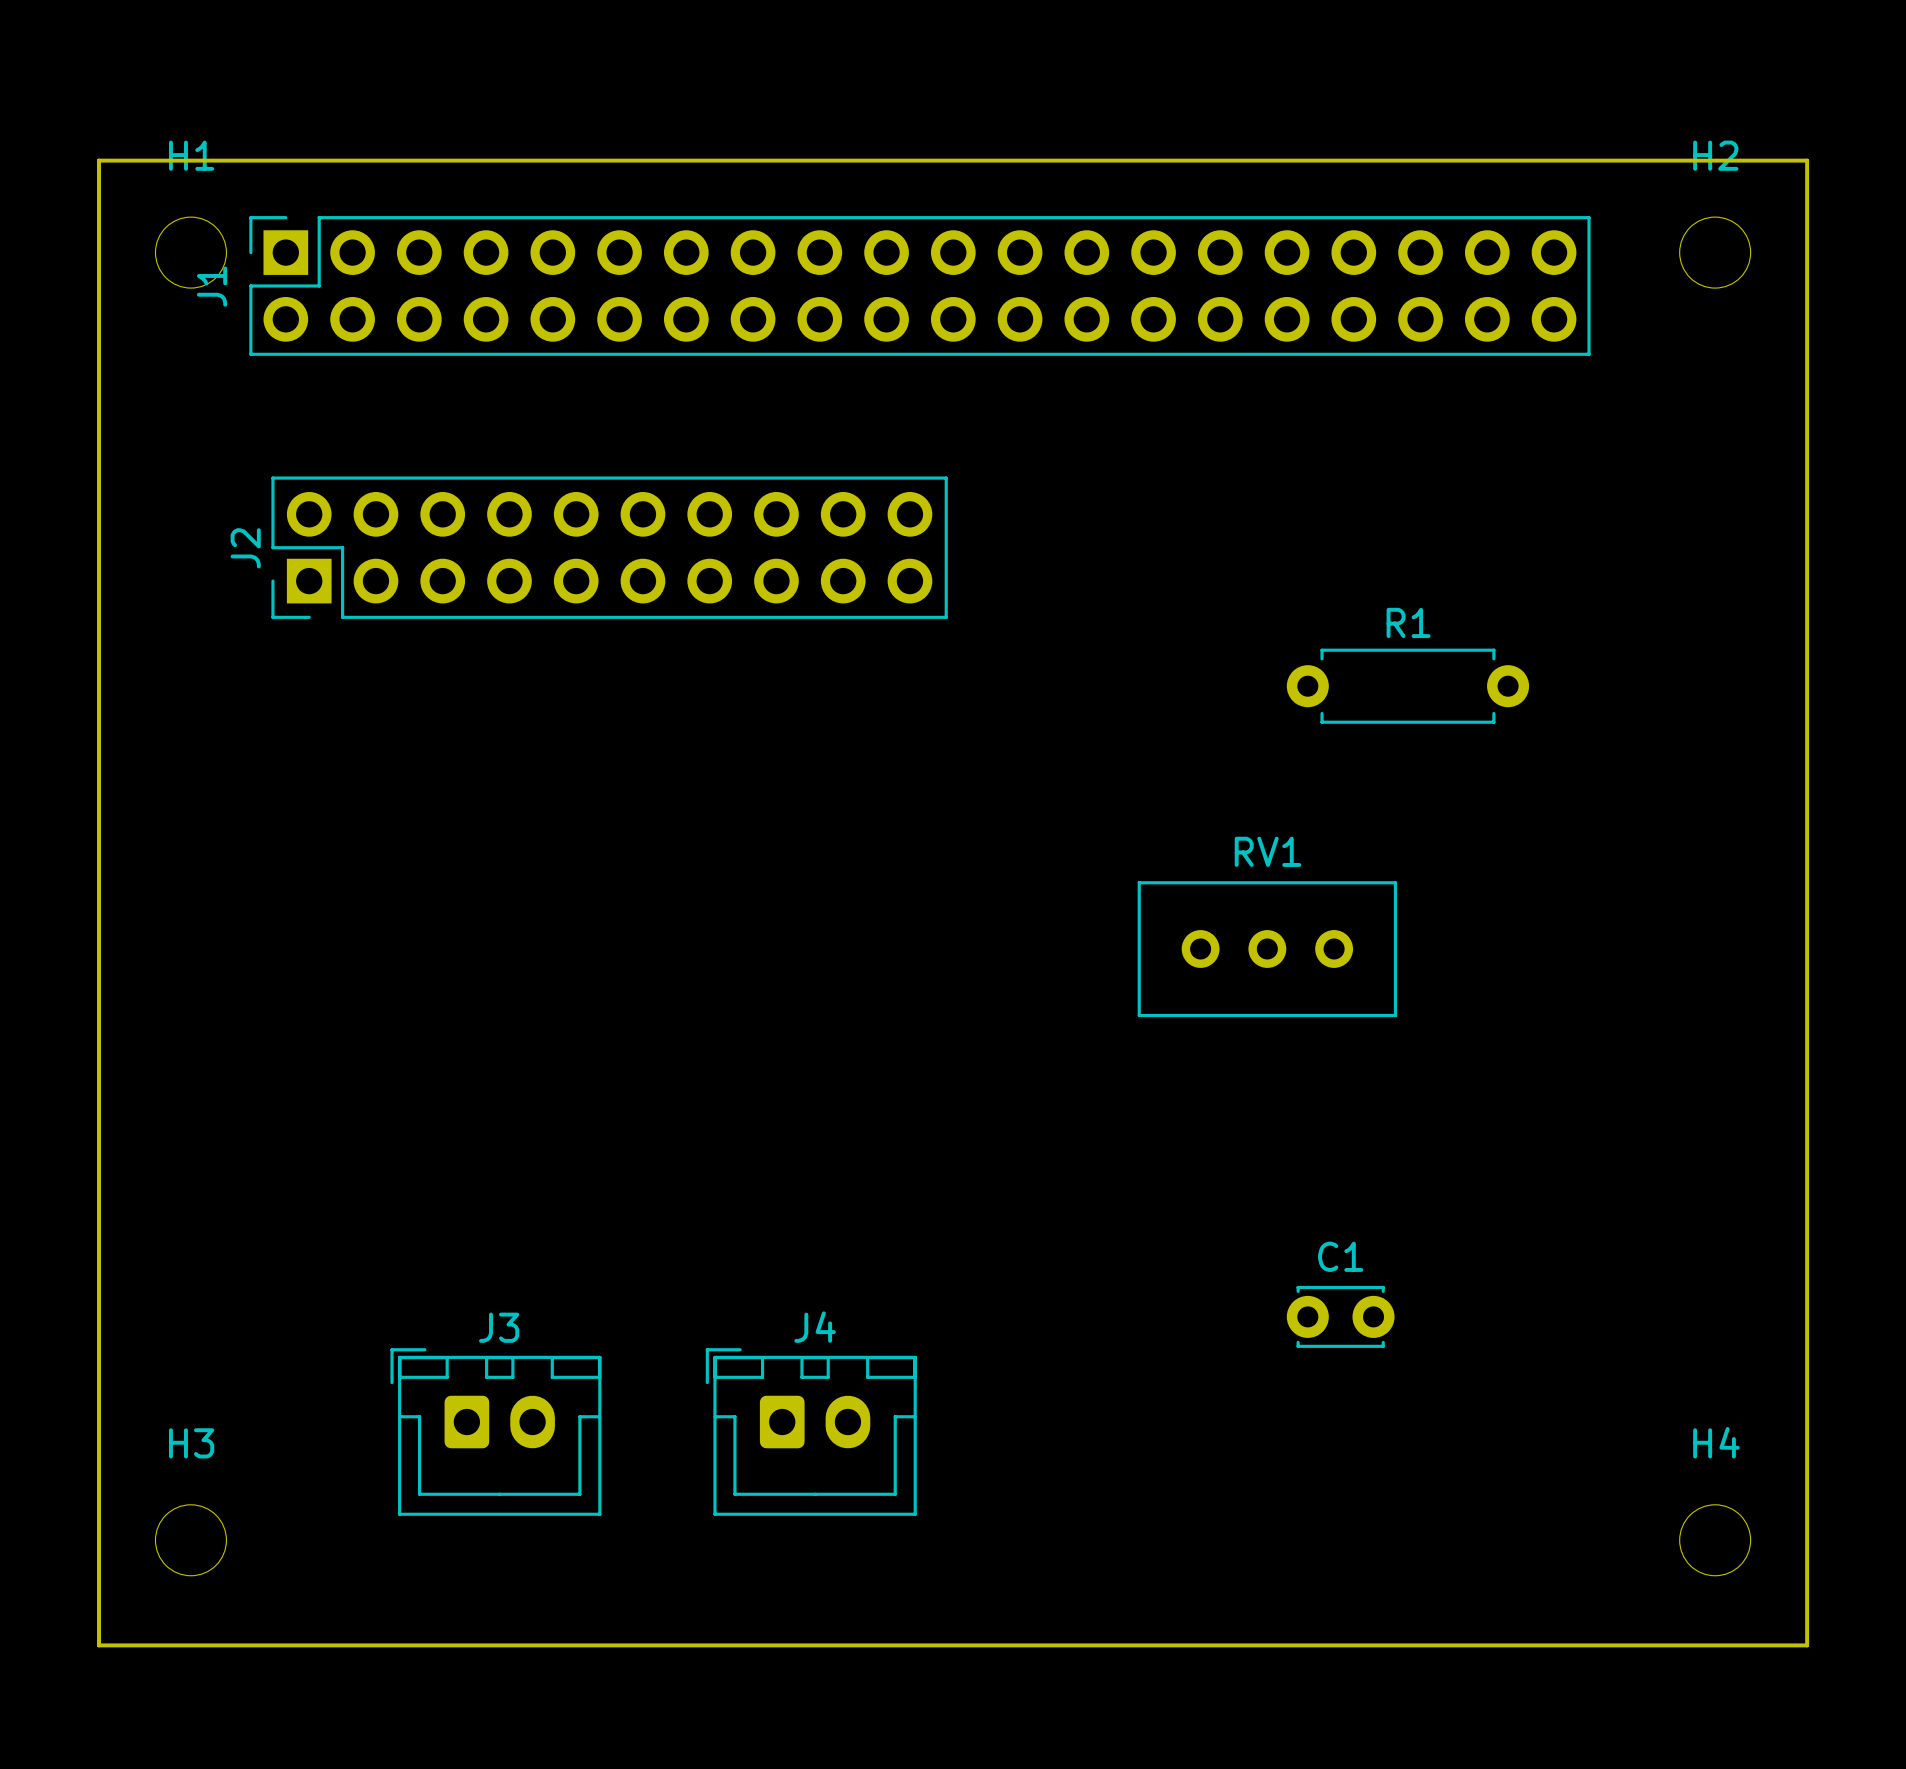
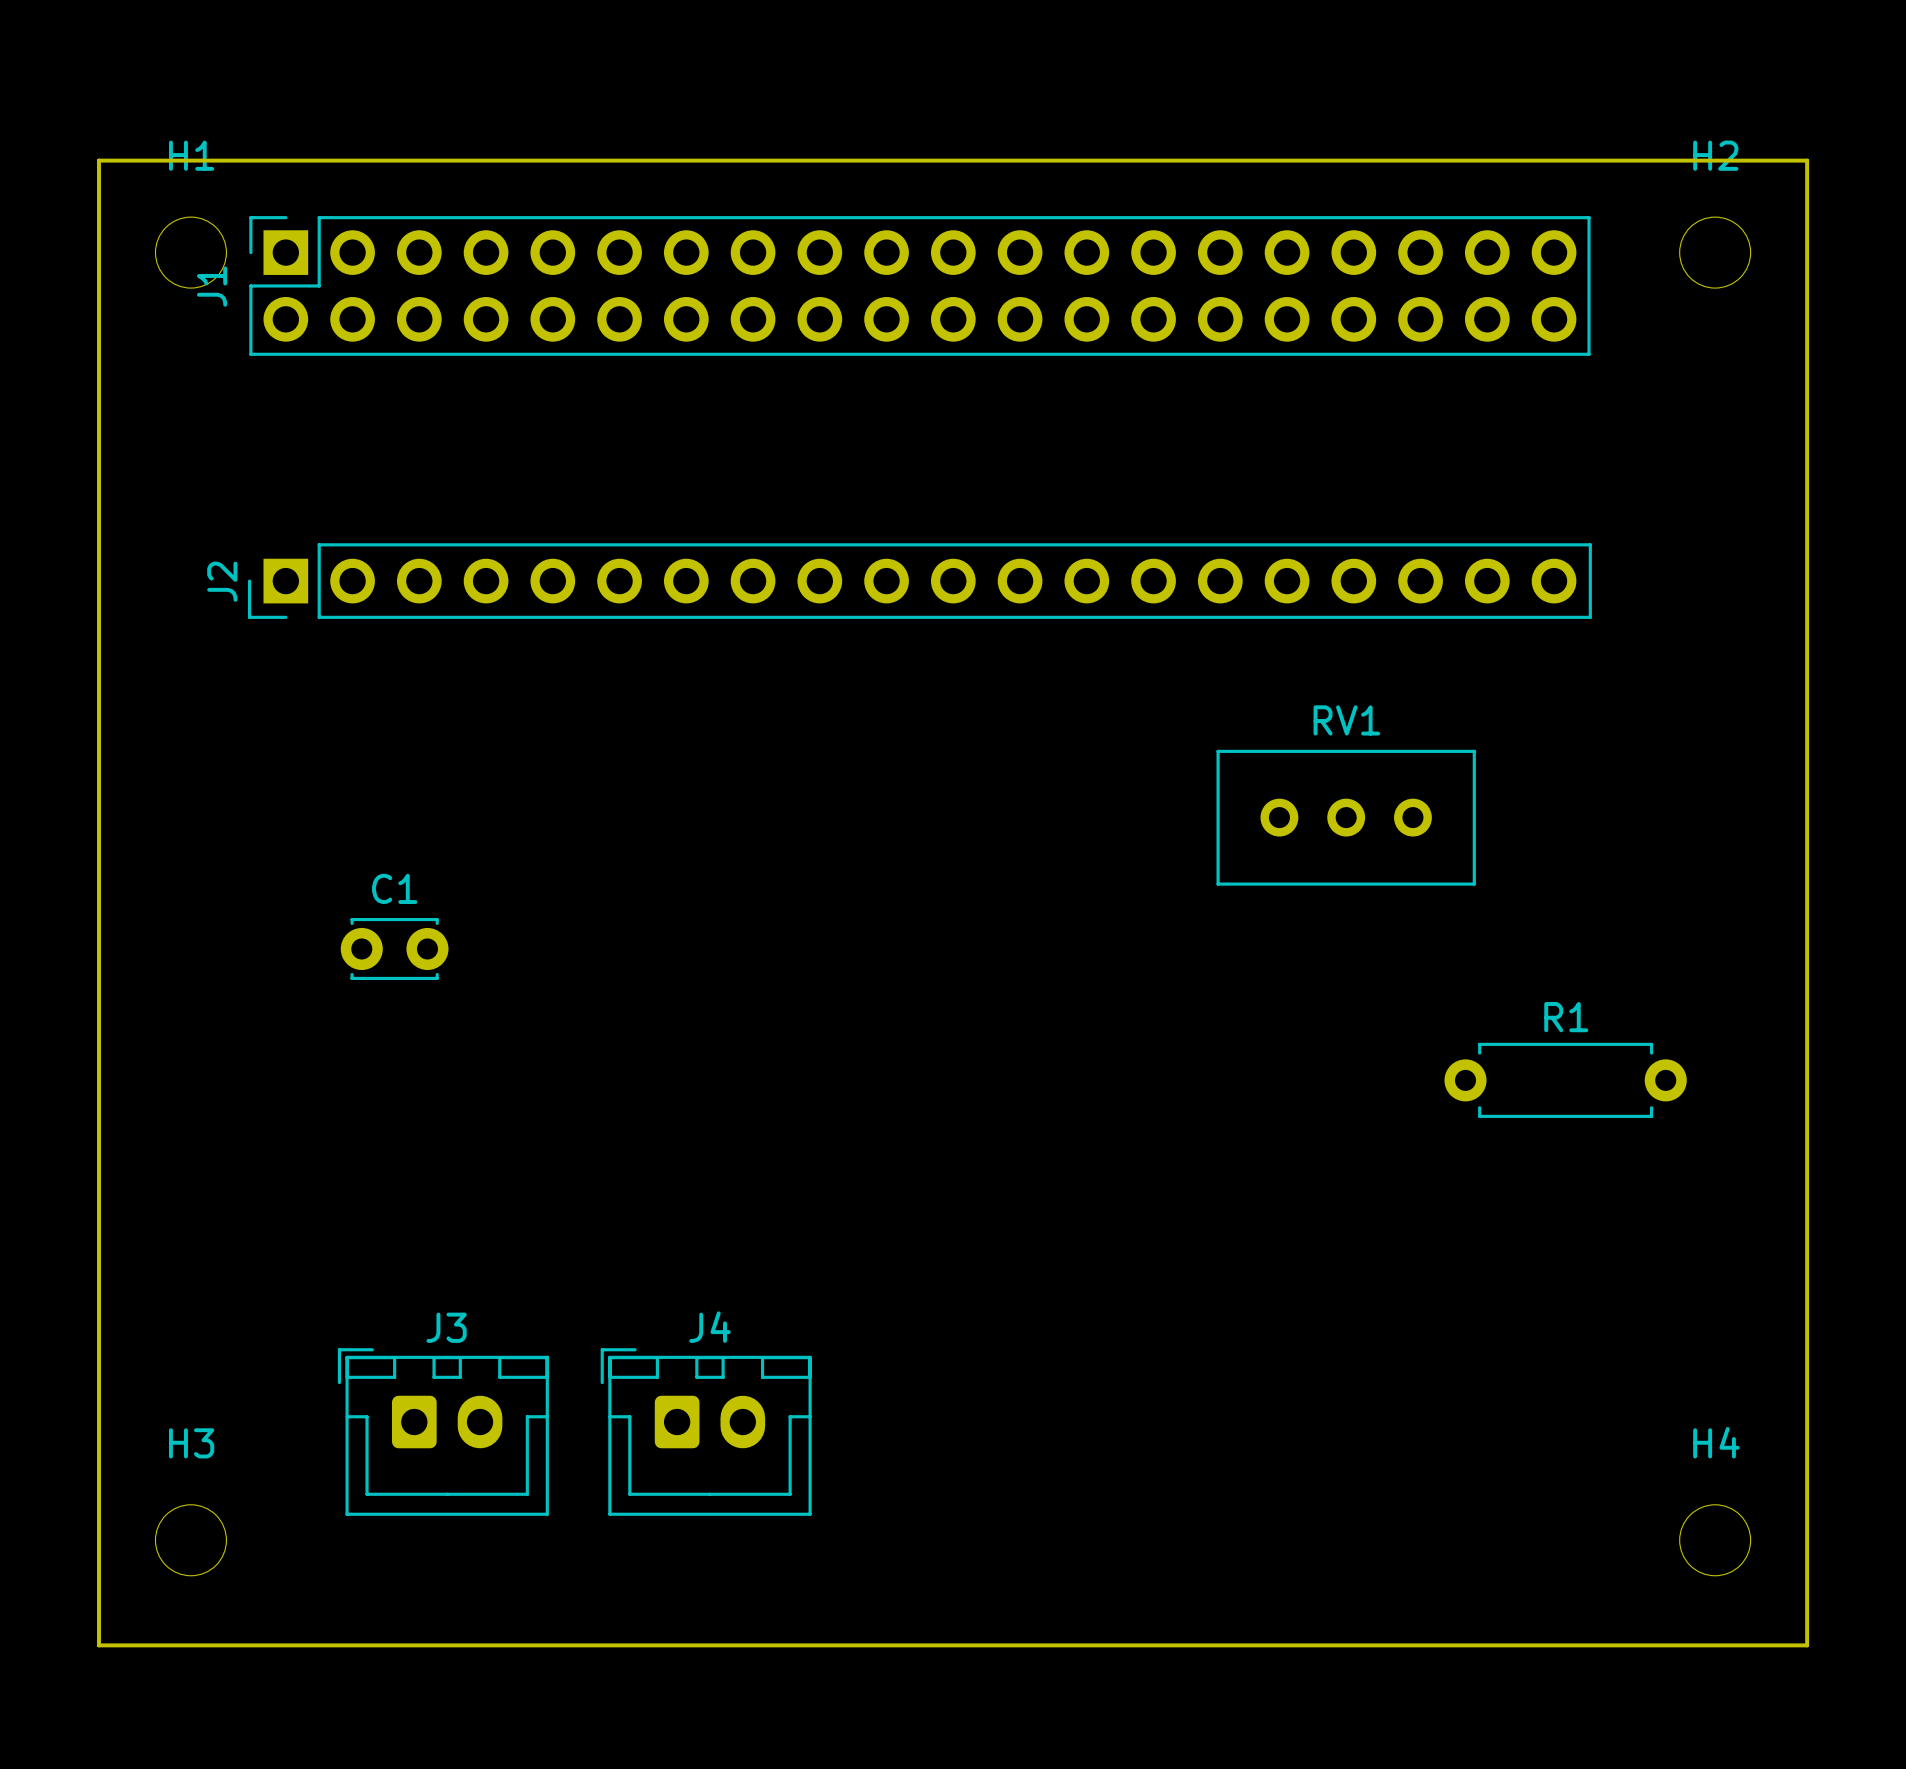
J2 footprint: [271, 476, 948, 619] -> [247, 543, 1592, 619]
J2 name position: J2 (245, 548) -> J2 (222, 581)
R1 position: (1407, 686) -> (1565, 1080)
RV1 position: (1267, 949) -> (1346, 817)
C1 position: (1340, 1316) -> (394, 948)
J3 position: (495, 1432) -> (443, 1432)
J4 position: (811, 1432) -> (706, 1432)

